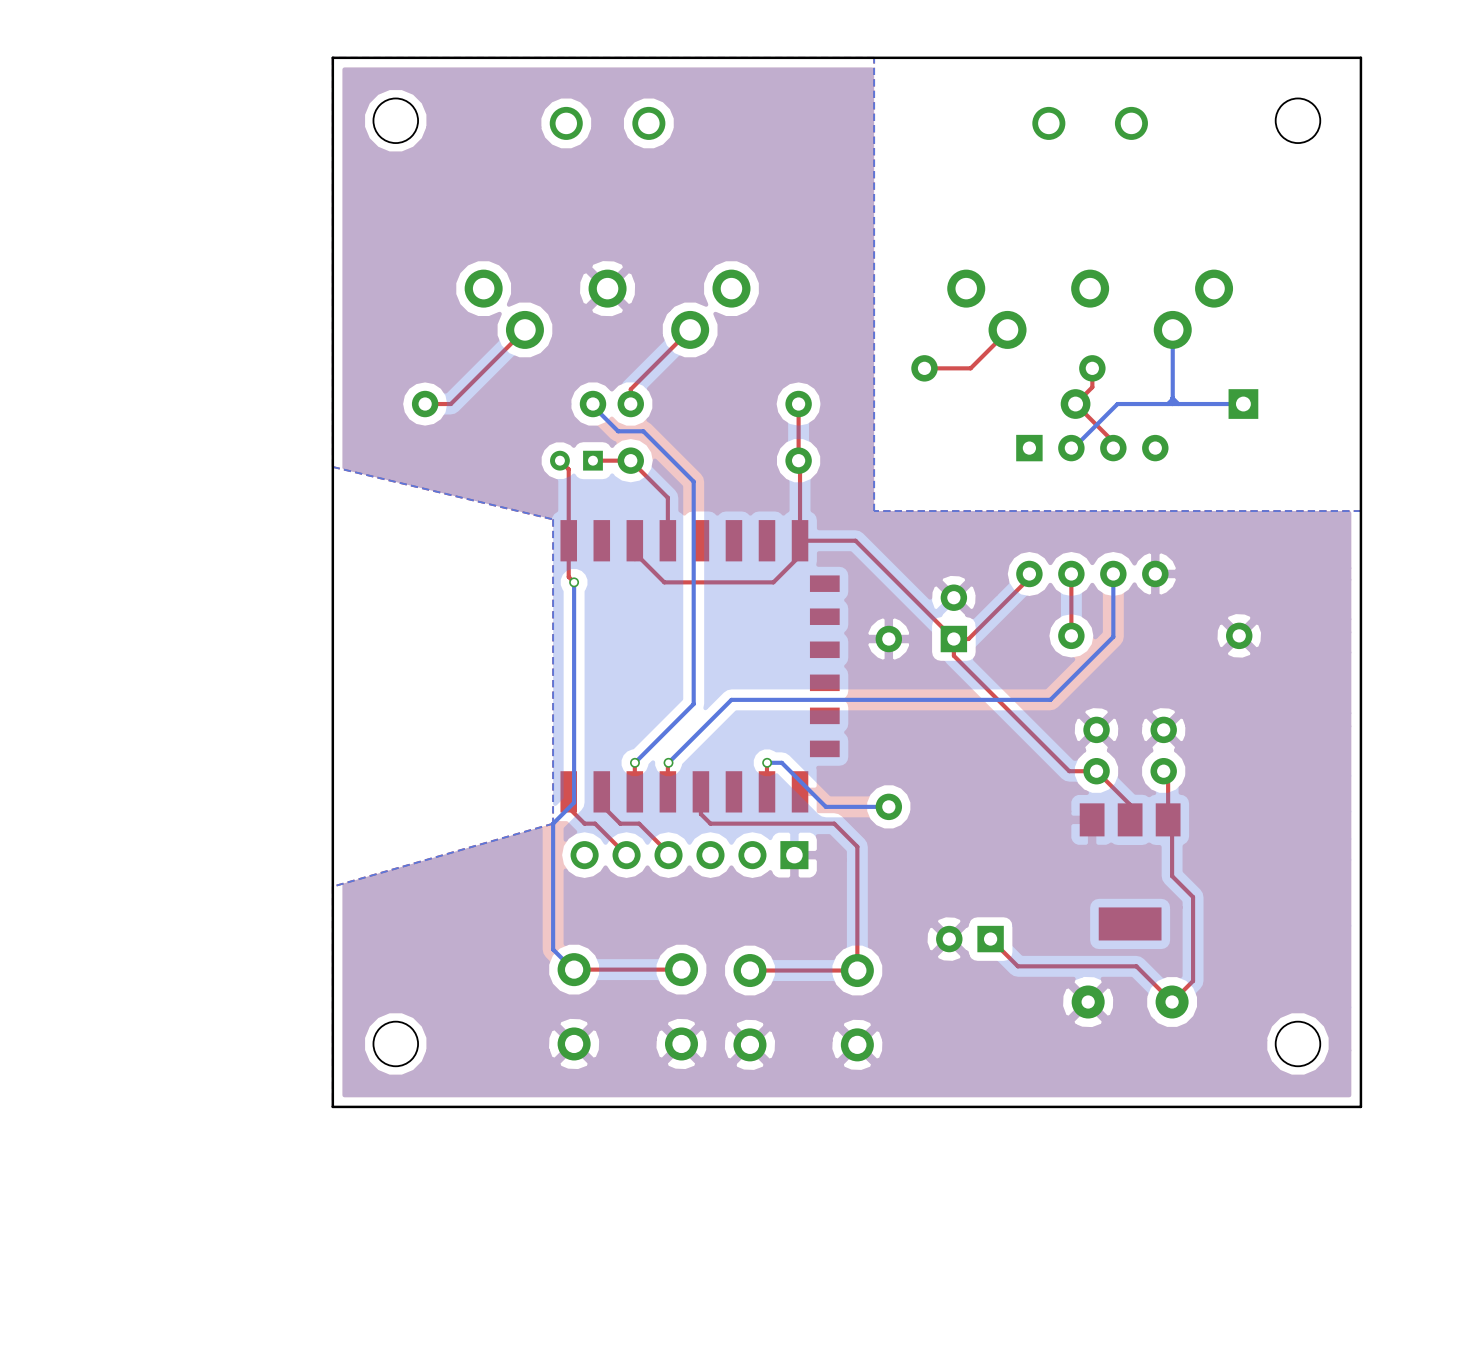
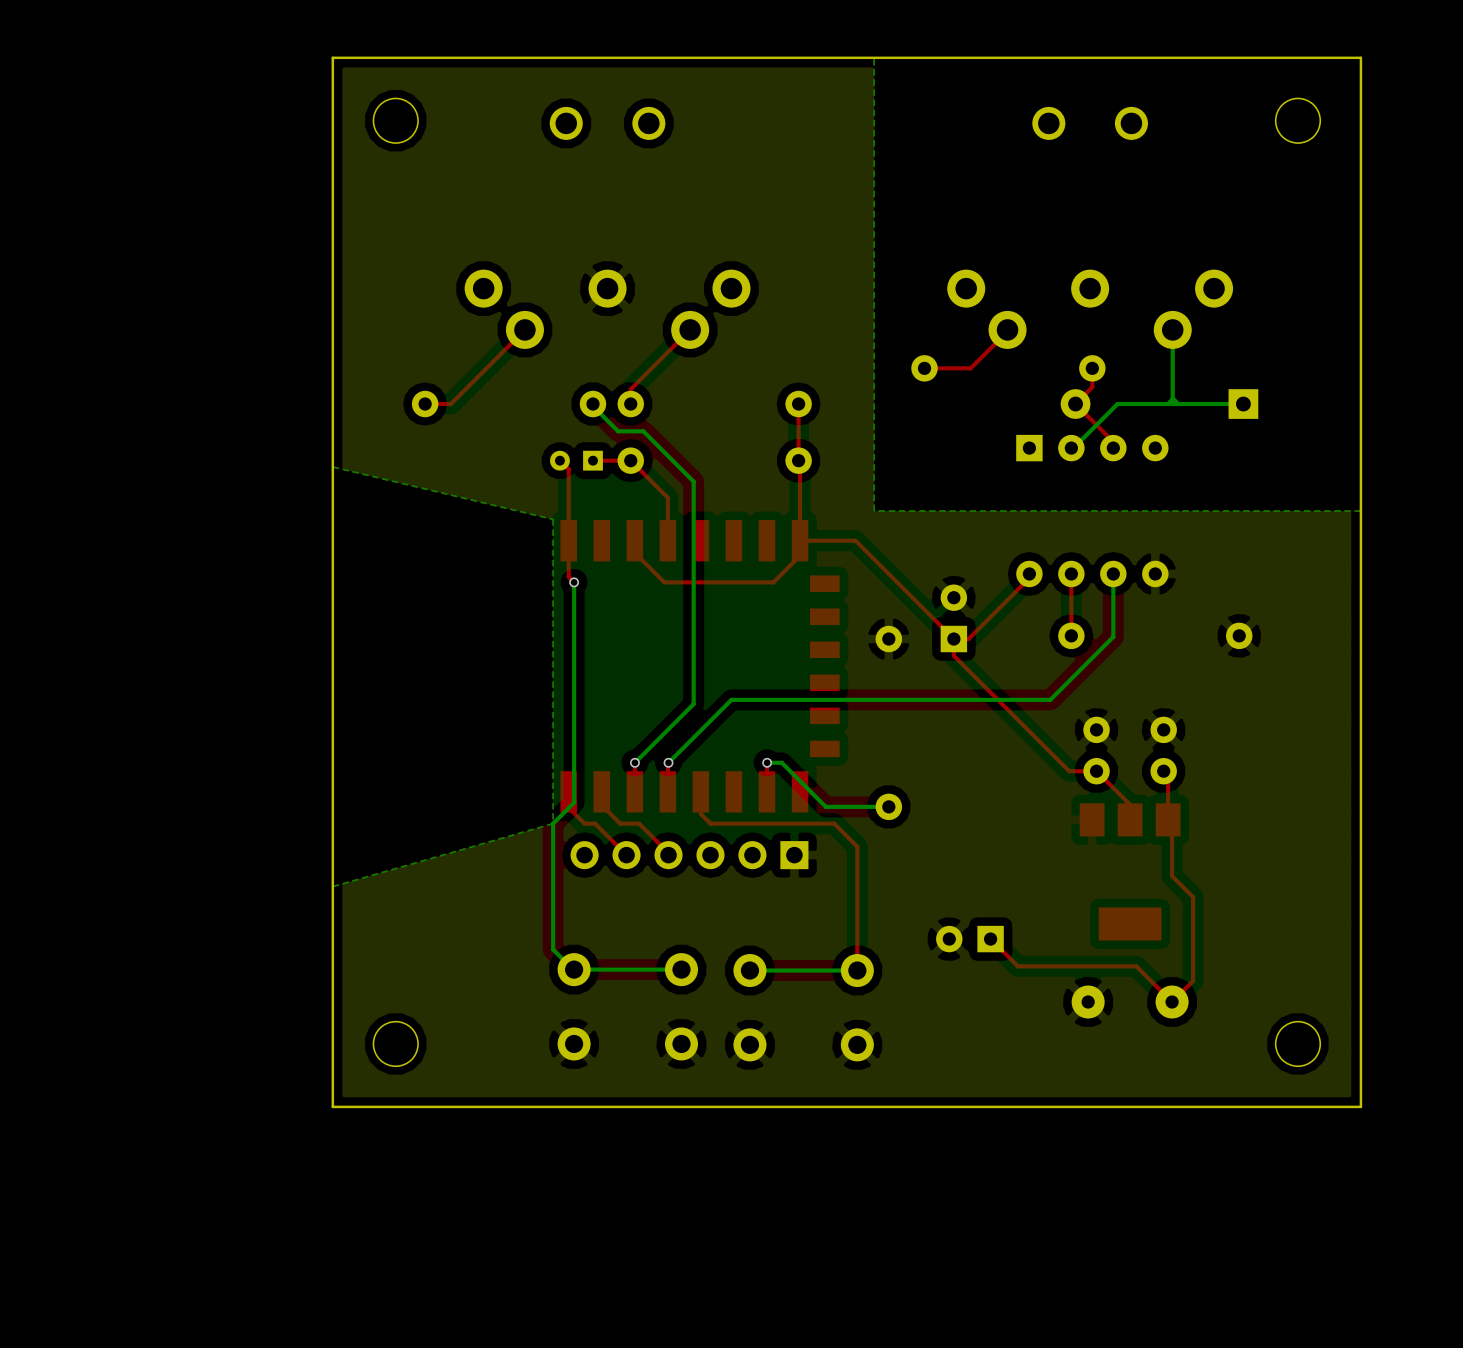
top track: (681, 969) (574, 969) -> none
bottom track: none -> (681, 969) (574, 969)
top track: (857, 970) (749, 970) -> none
bottom track: none -> (857, 970) (749, 970)

